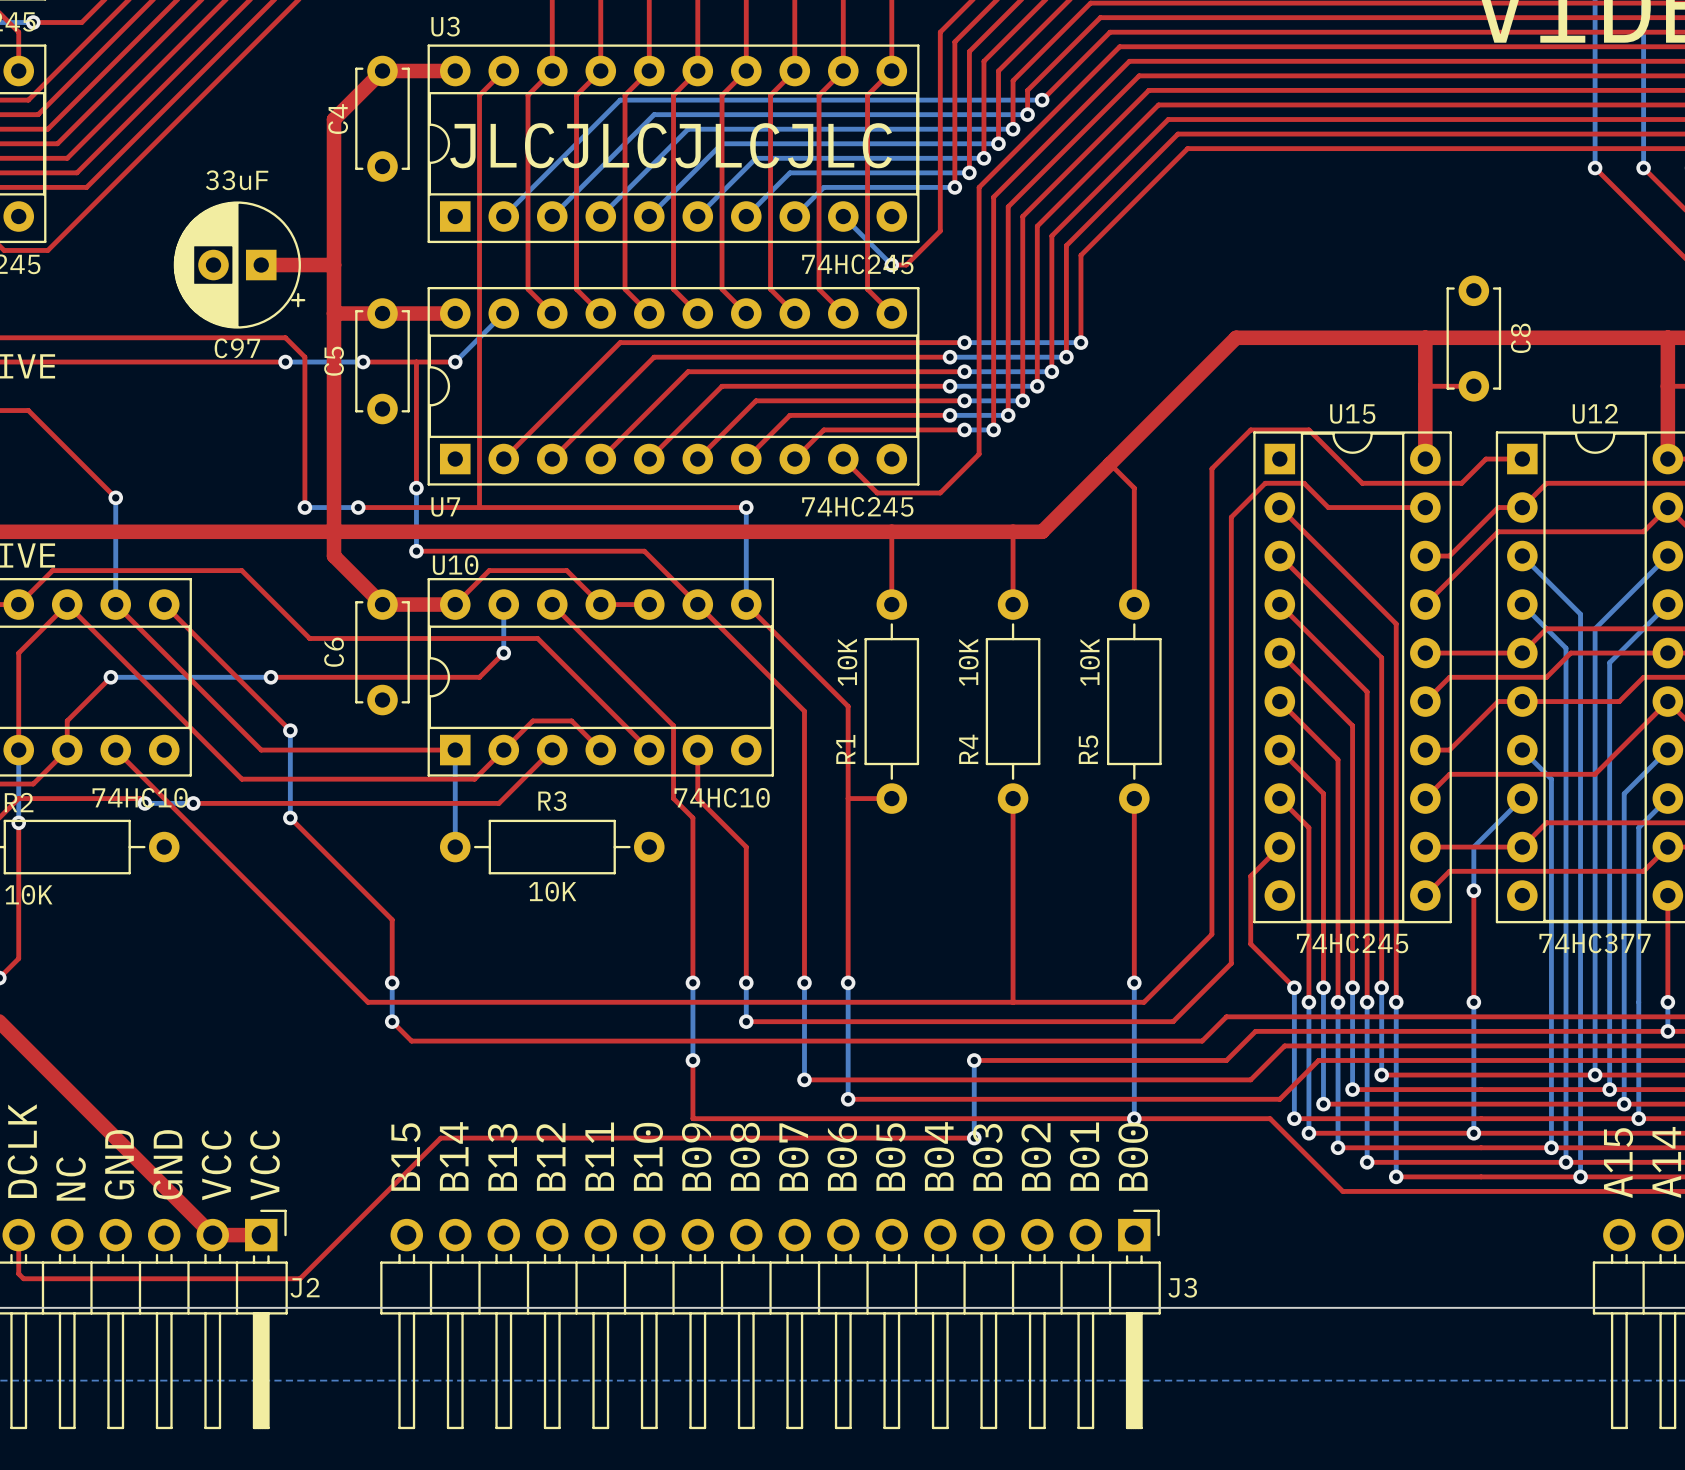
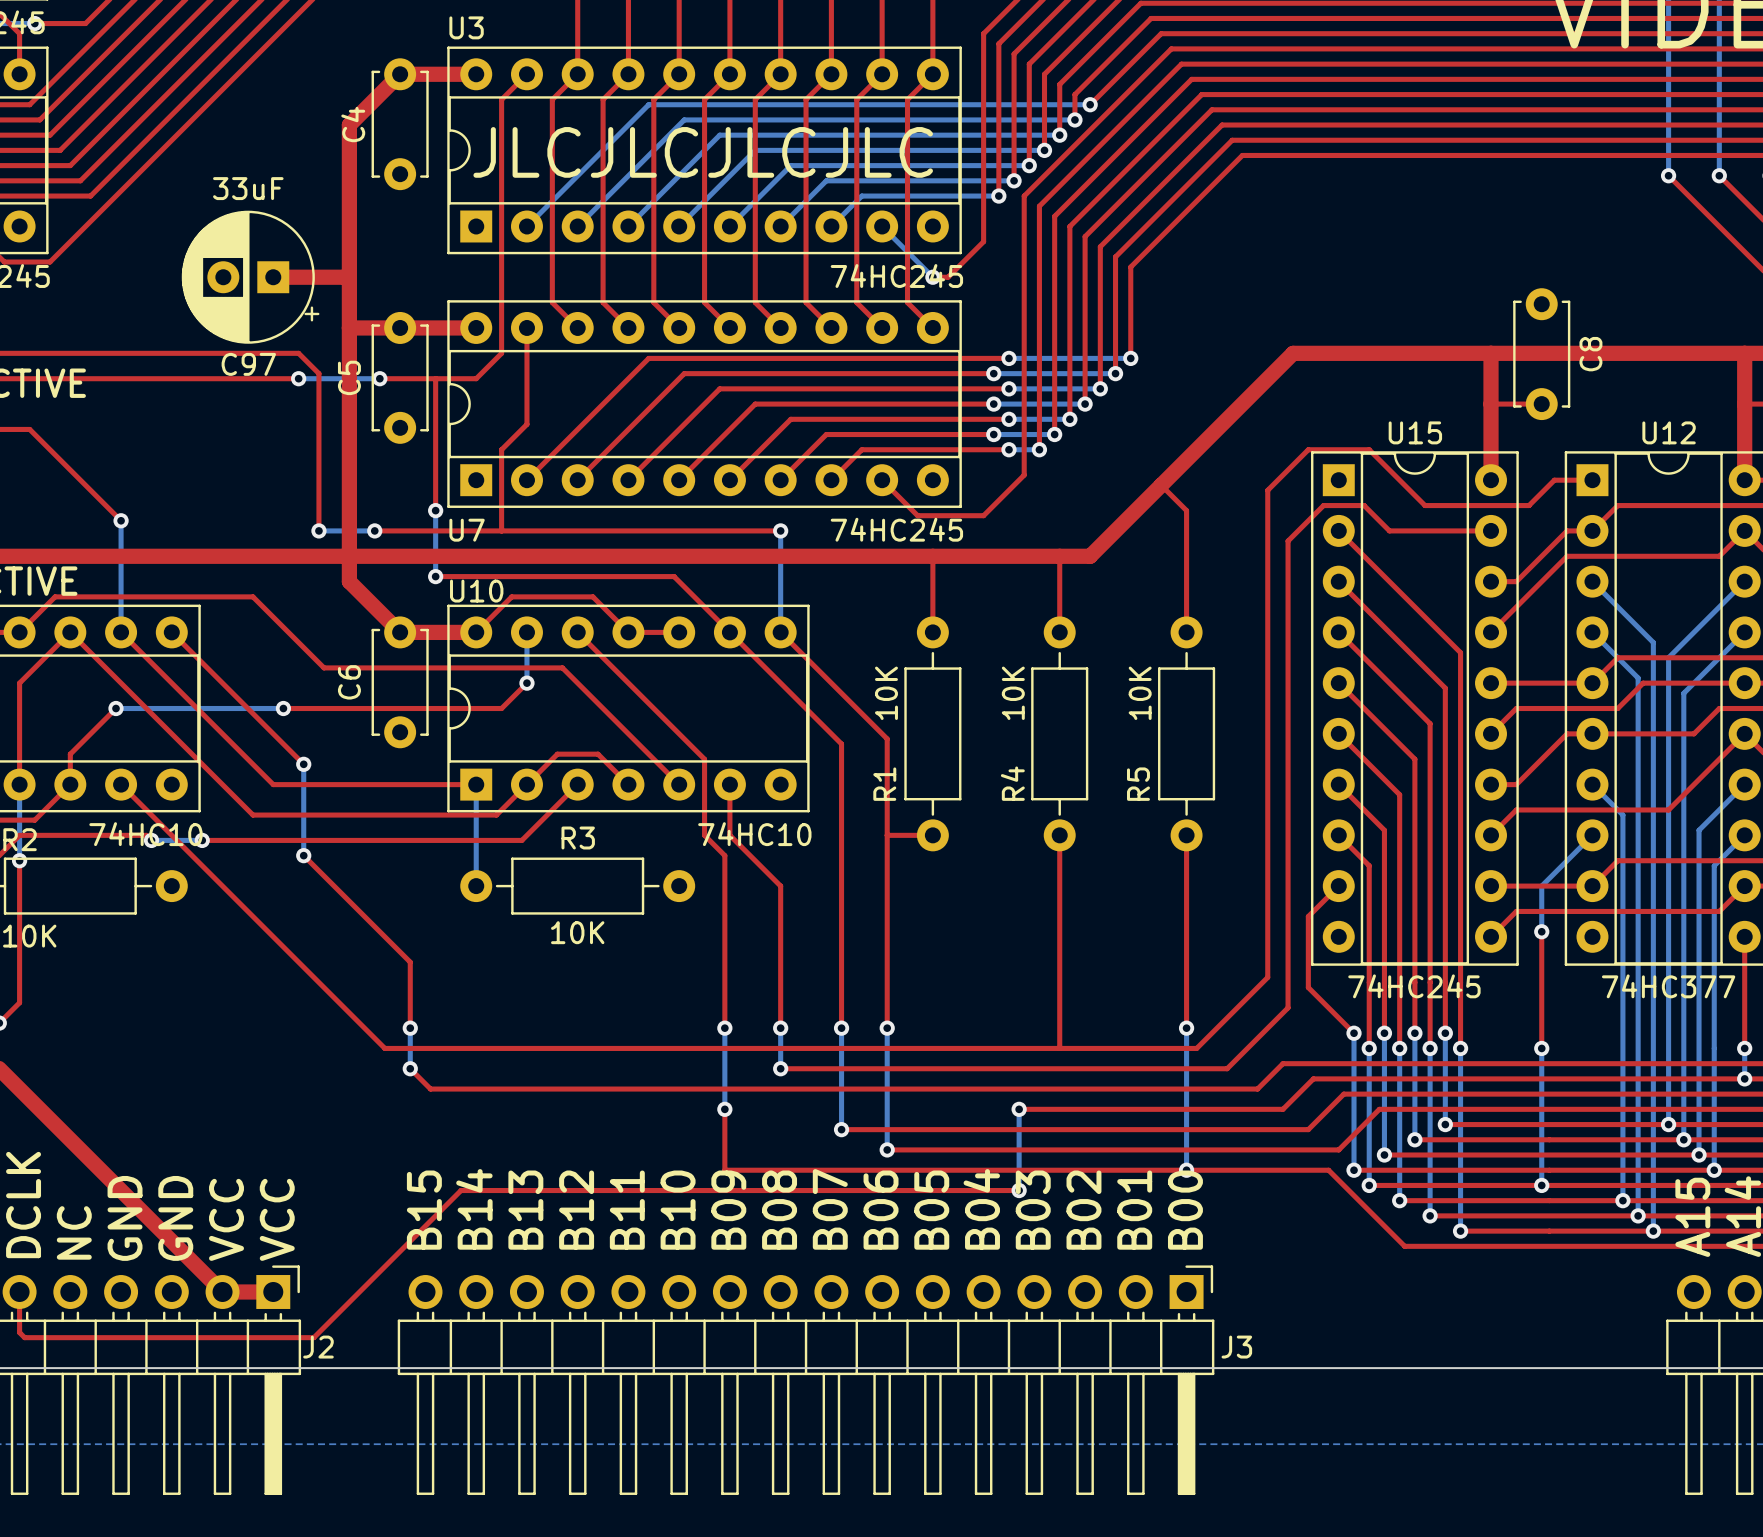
bottom track: (503, 313) (455, 362) -> none
top track: (479, 337) (479, 429) -> (526, 327) (526, 424) (501, 449)
top track: none -> (501, 353) (476, 378)
via: (455, 362) -> none

